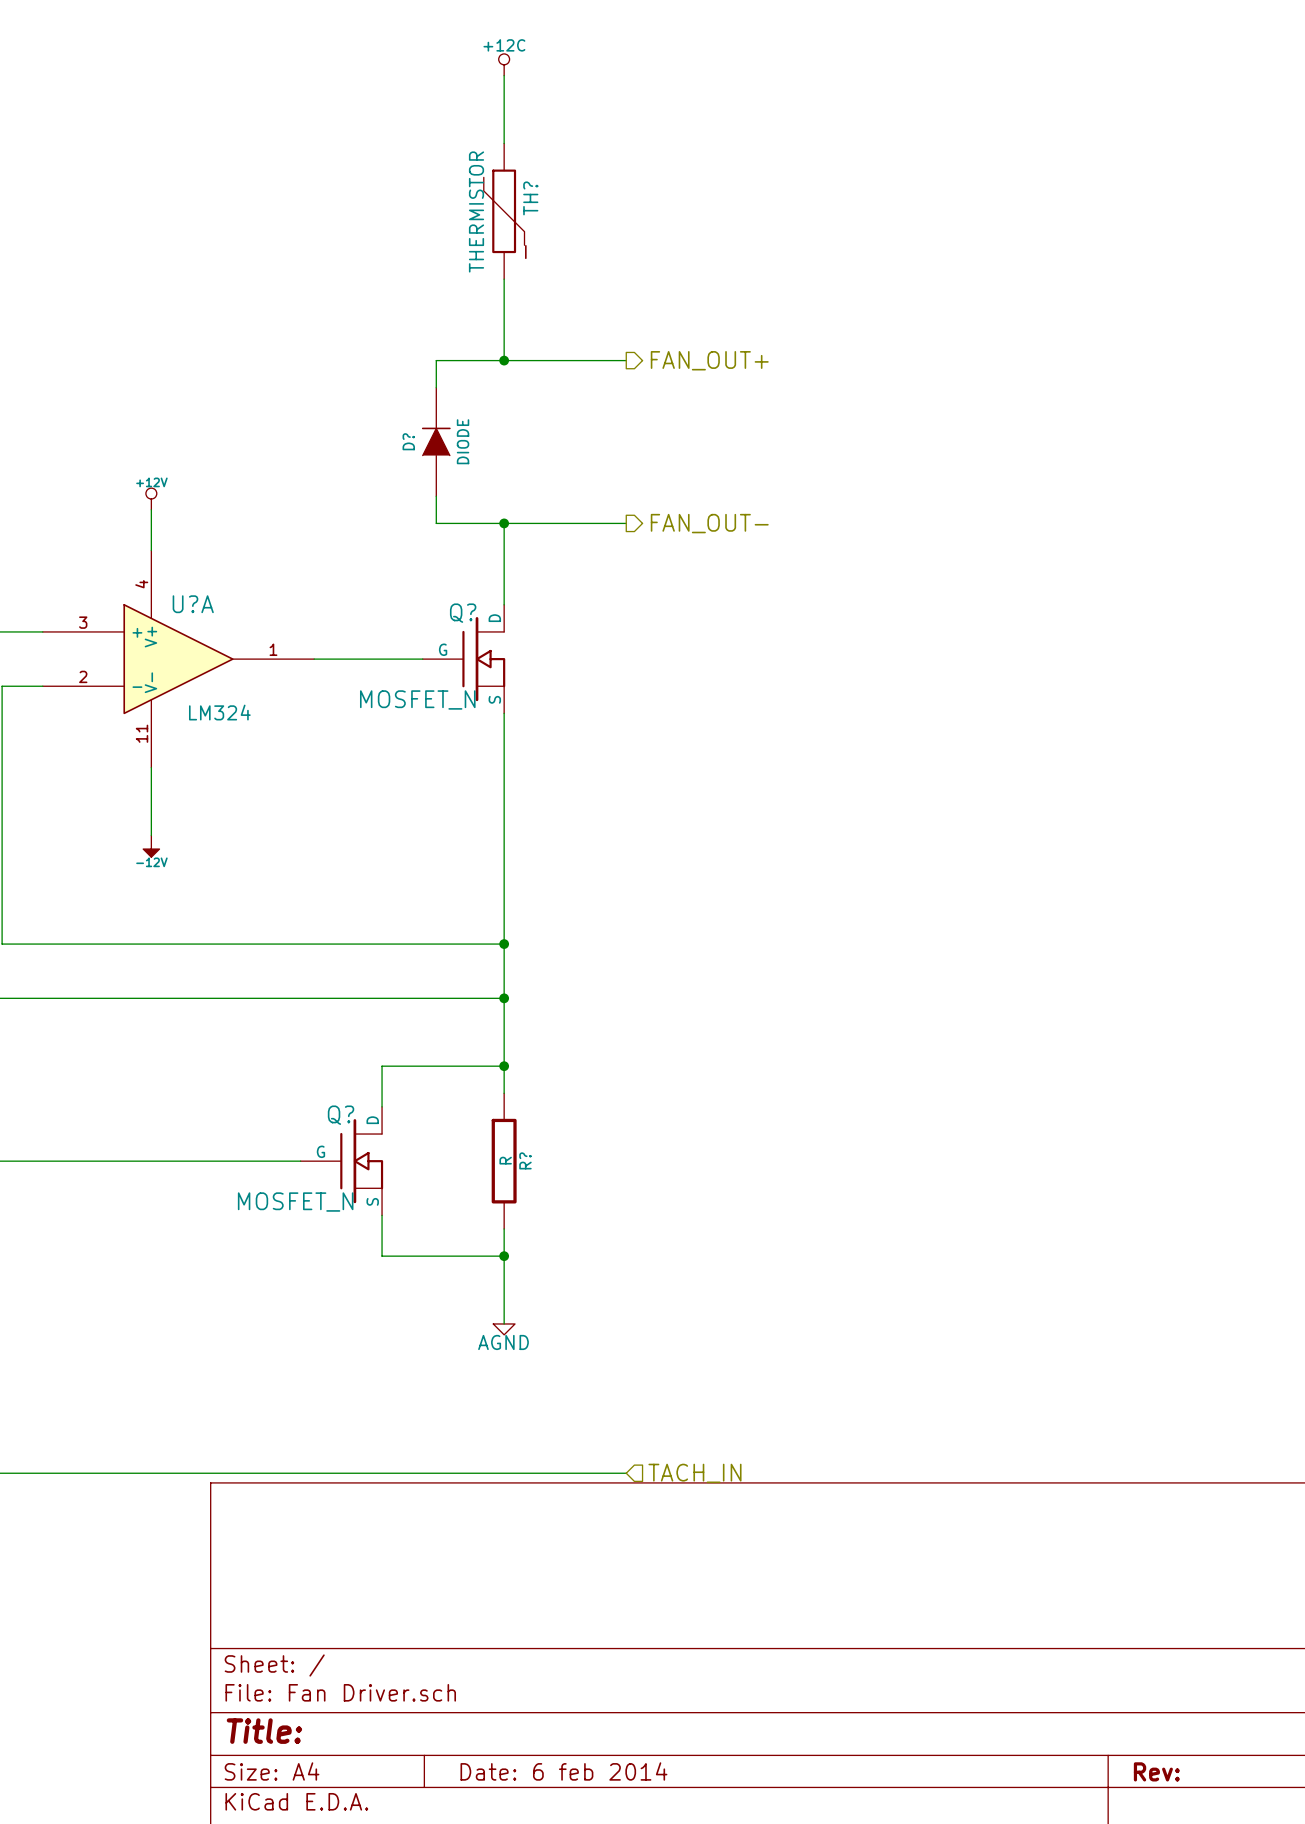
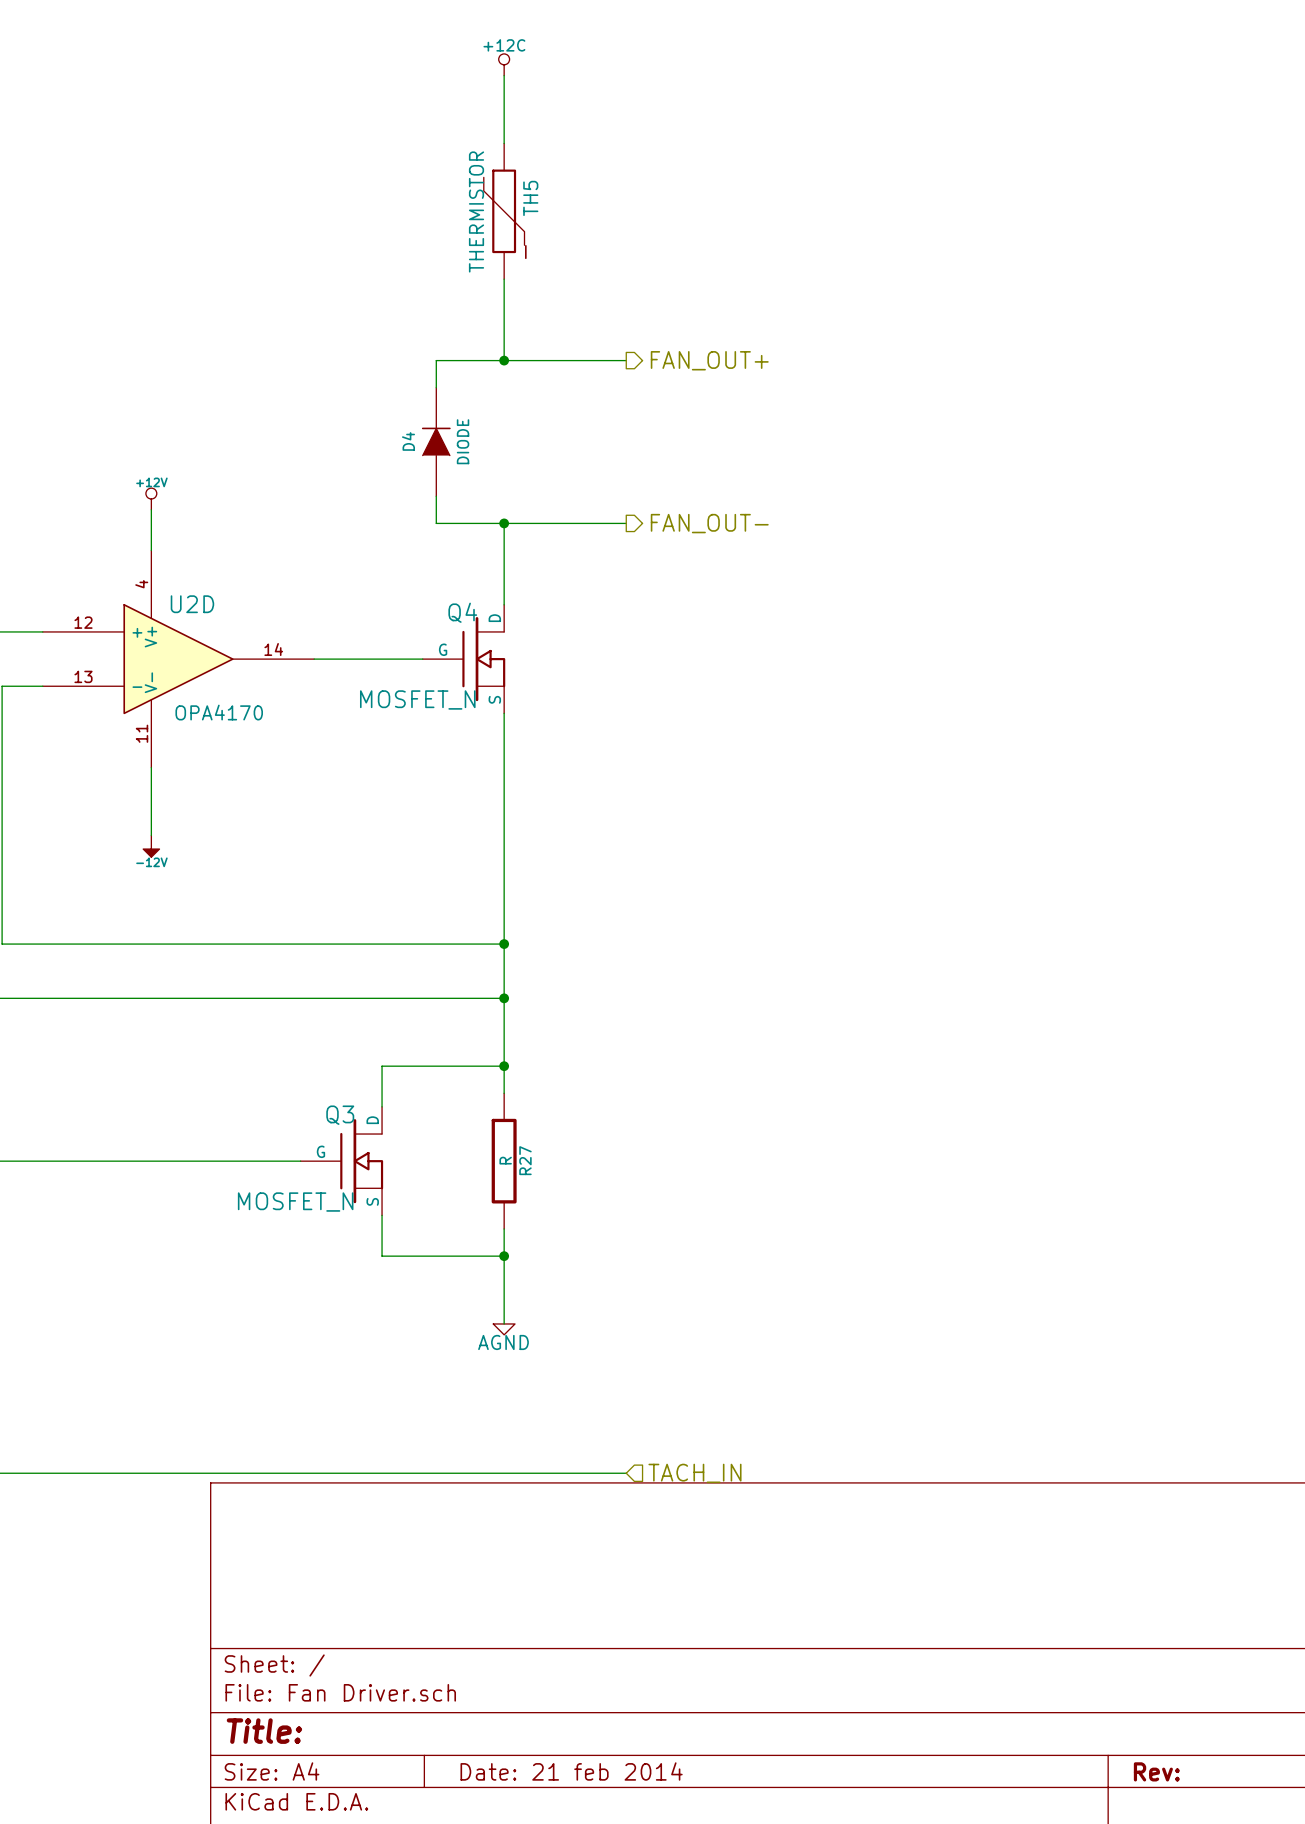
TH? name: TH? (530, 198) -> TH5 (530, 198)
D? name: D? (408, 441) -> D4 (408, 441)
U?A name: U?A (193, 604) -> U2D (192, 604)
Q? name: Q? (463, 613) -> Q4 (462, 612)
U?A pin number: 3 (83, 622) -> 12 (83, 622)
U?A pin number: 1 (273, 649) -> 14 (273, 649)
U?A pin number: 2 (83, 676) -> 13 (83, 676)
U?A value: LM324 (219, 712) -> OPA4170 (219, 712)
Q? name: Q? (341, 1115) -> Q3 (340, 1115)
R? name: R? (525, 1160) -> R27 (525, 1160)
title block: Date: 6 feb 2014 (563, 1771) -> Date: 21 feb 2014 (571, 1771)

